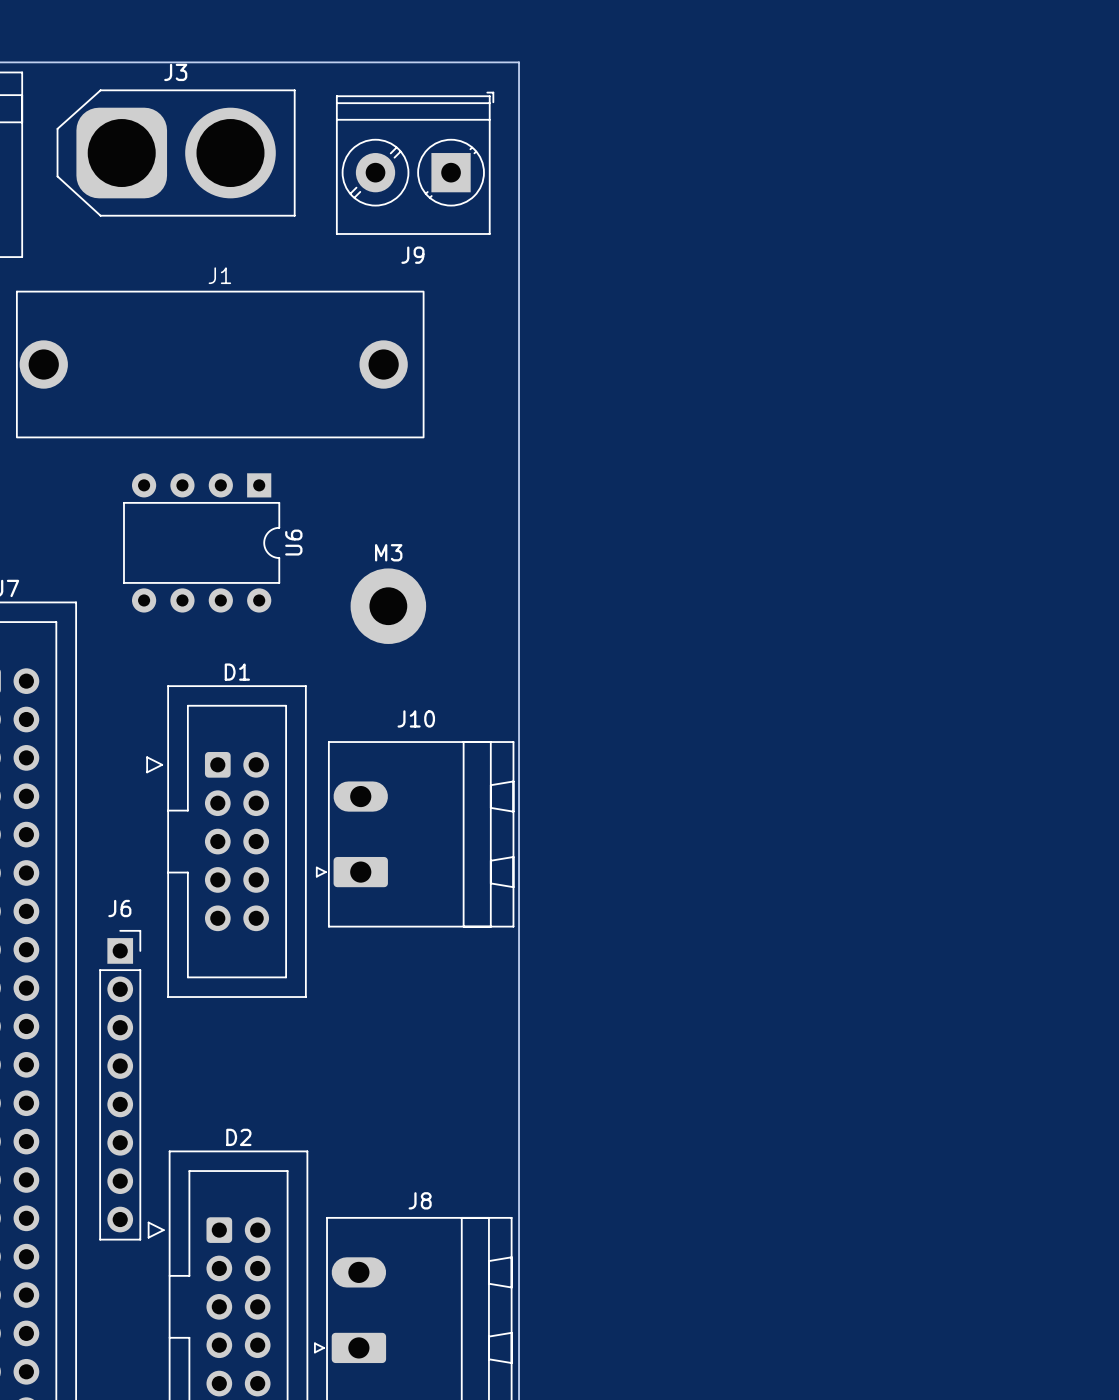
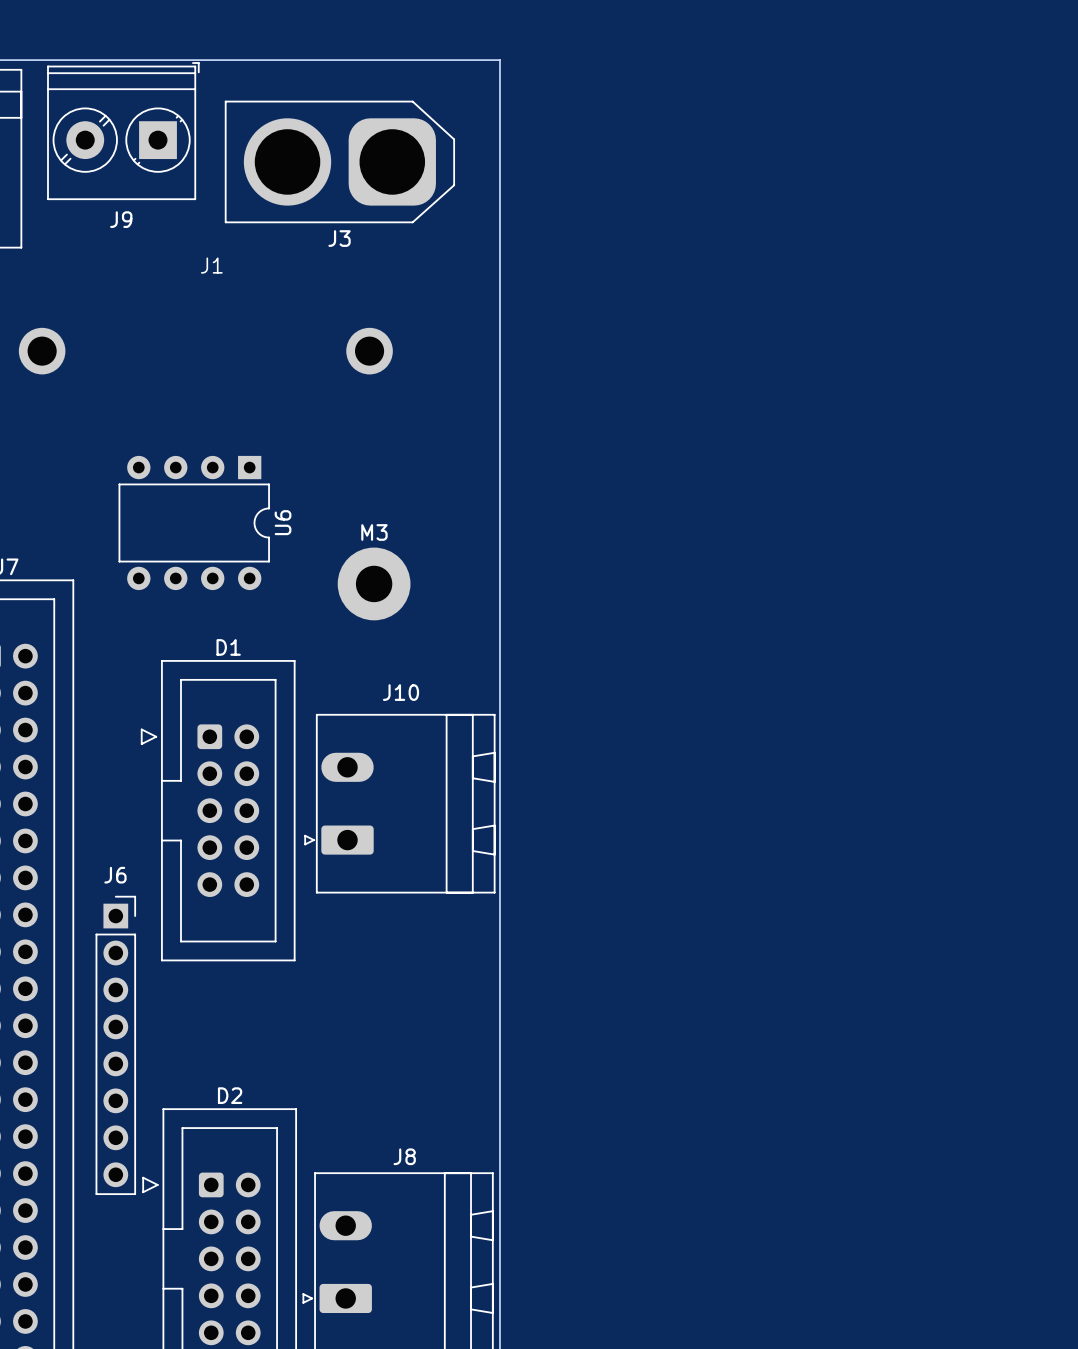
J3 rotation: 0° (176, 153) -> 180° (339, 161)
J3 position: (176, 153) -> (339, 161)
J9 position: (415, 163) -> (123, 131)
J1 footprint: [16, 290, 425, 439] -> [18, 327, 393, 375]

